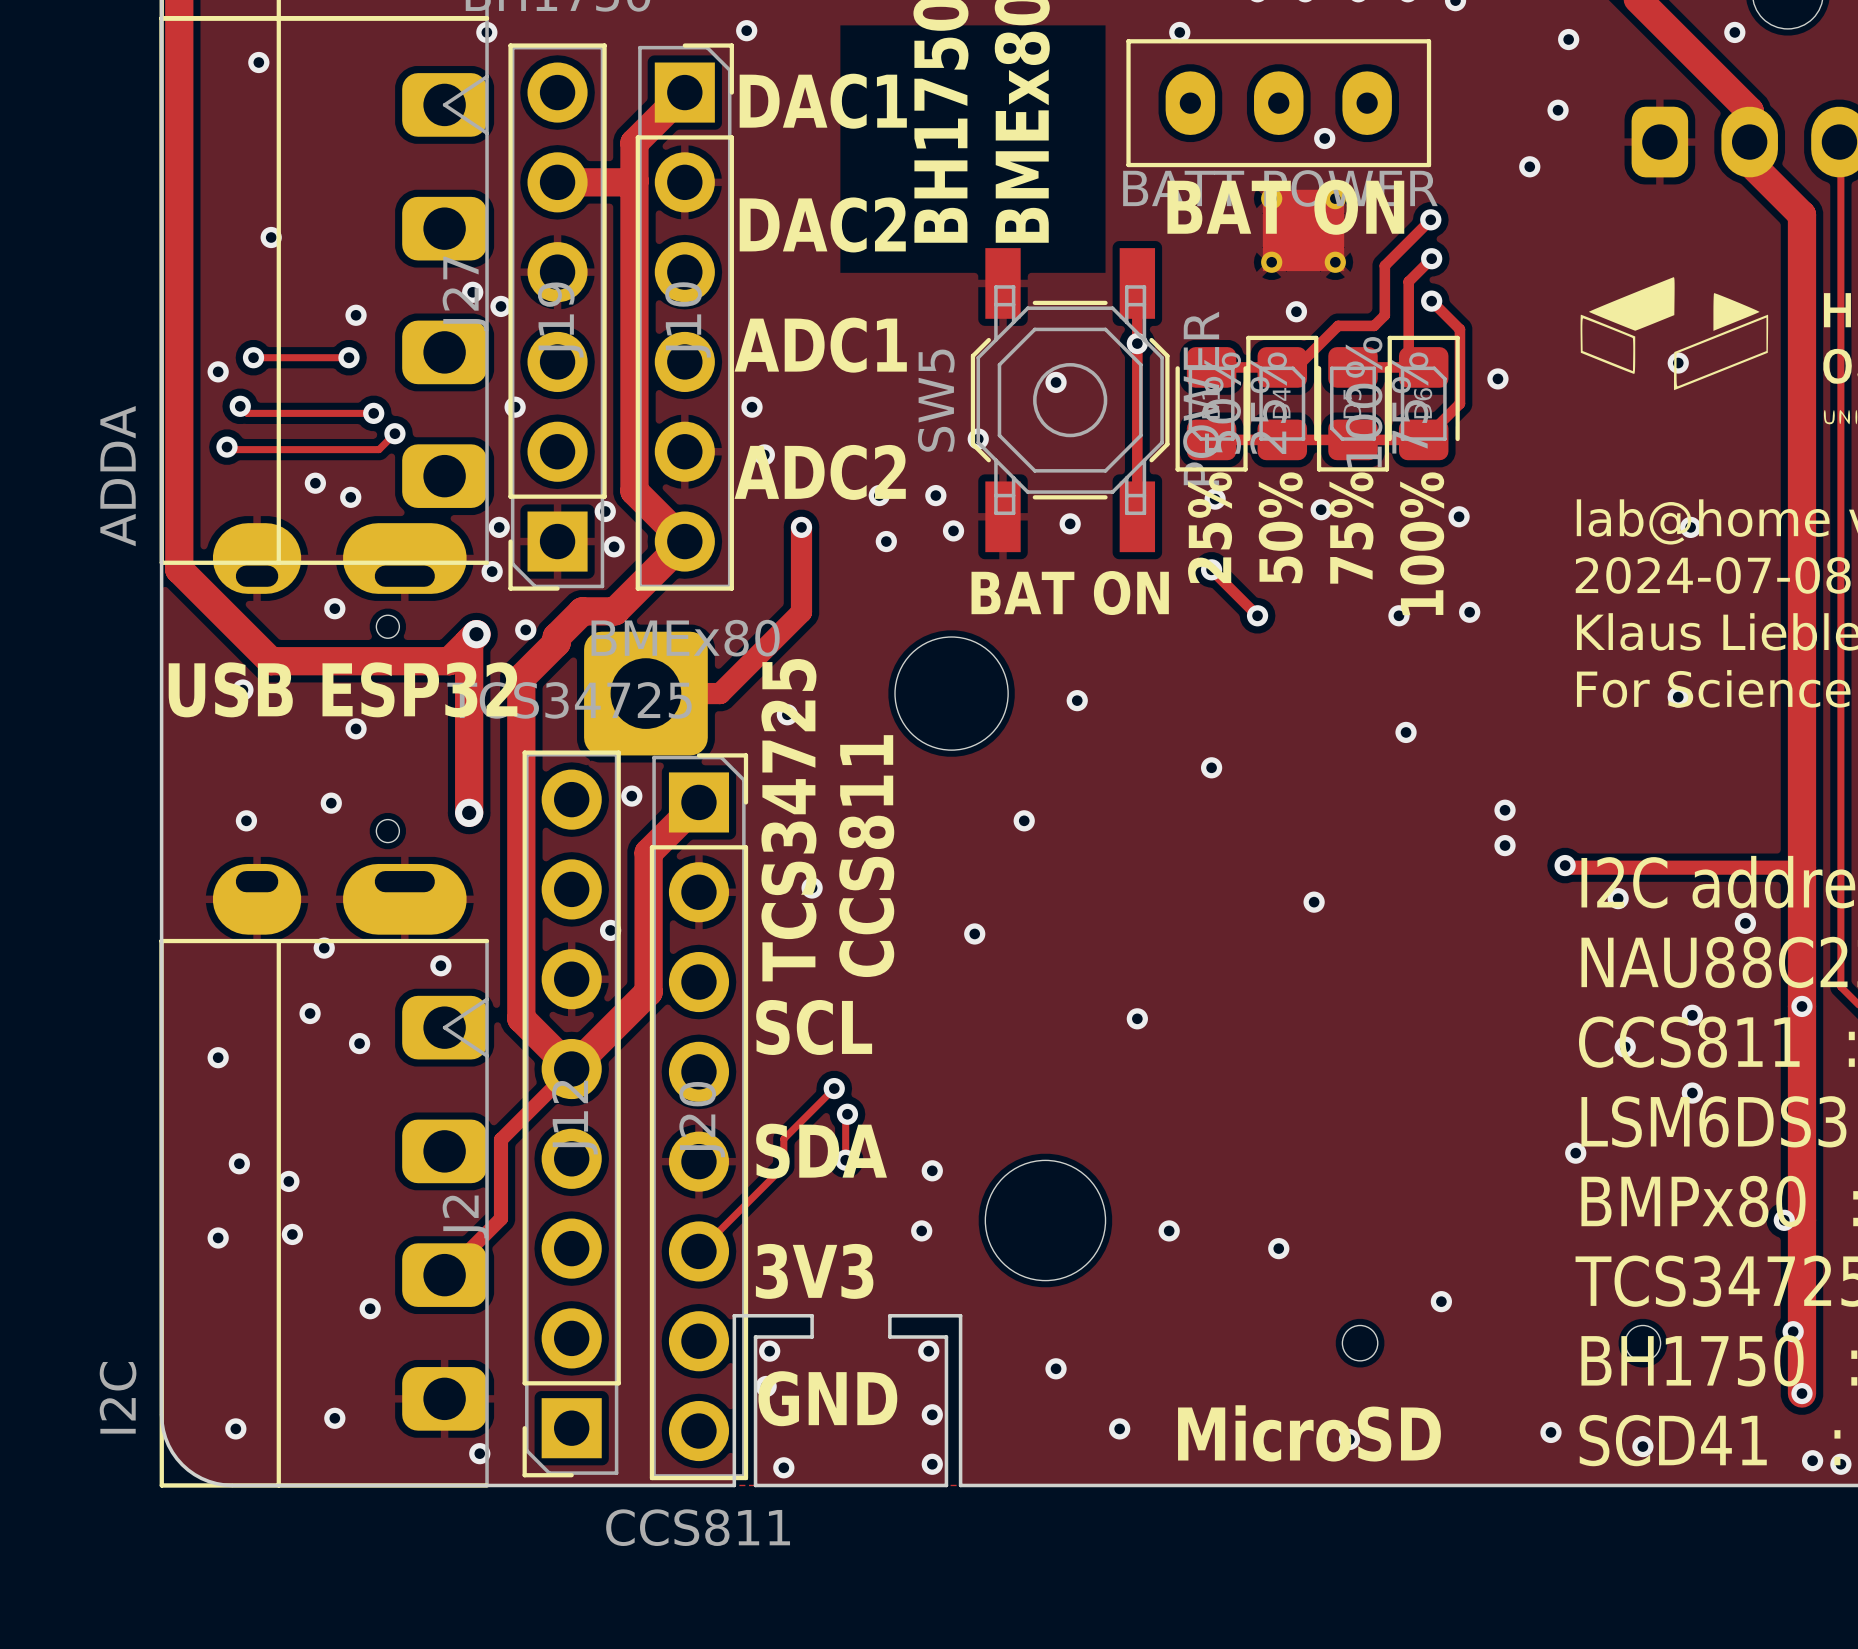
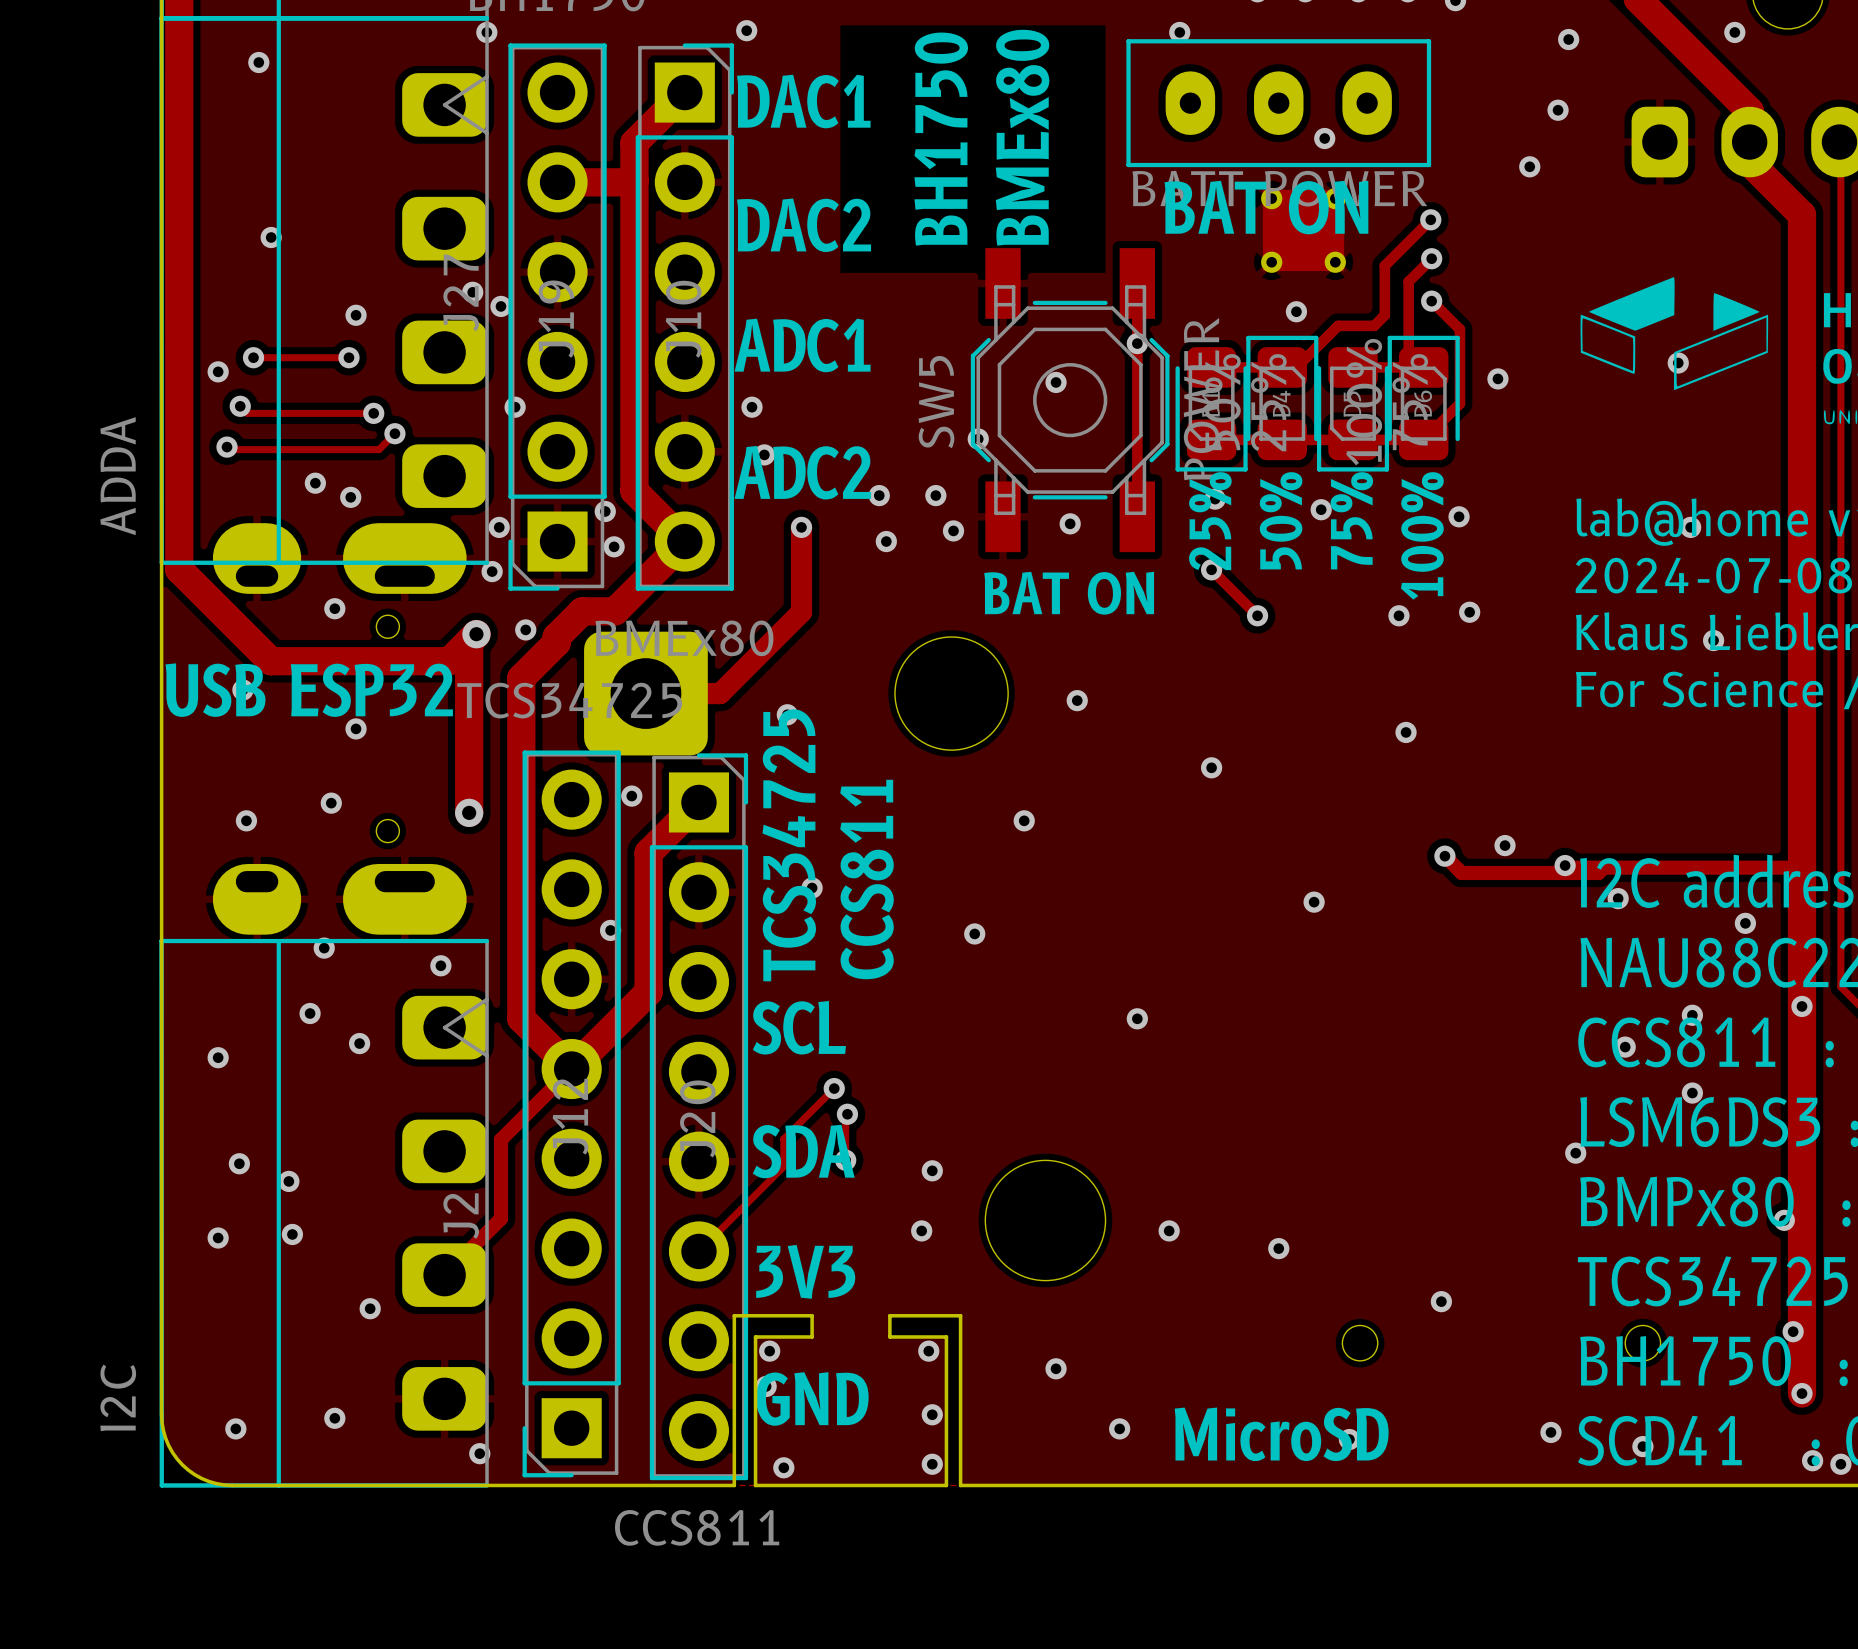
via position: (1678, 697) -> (1713, 640)
via position: (1505, 810) -> (1444, 856)
track: none -> (1444, 856) (1461, 872) (1598, 872) (1604, 867)

